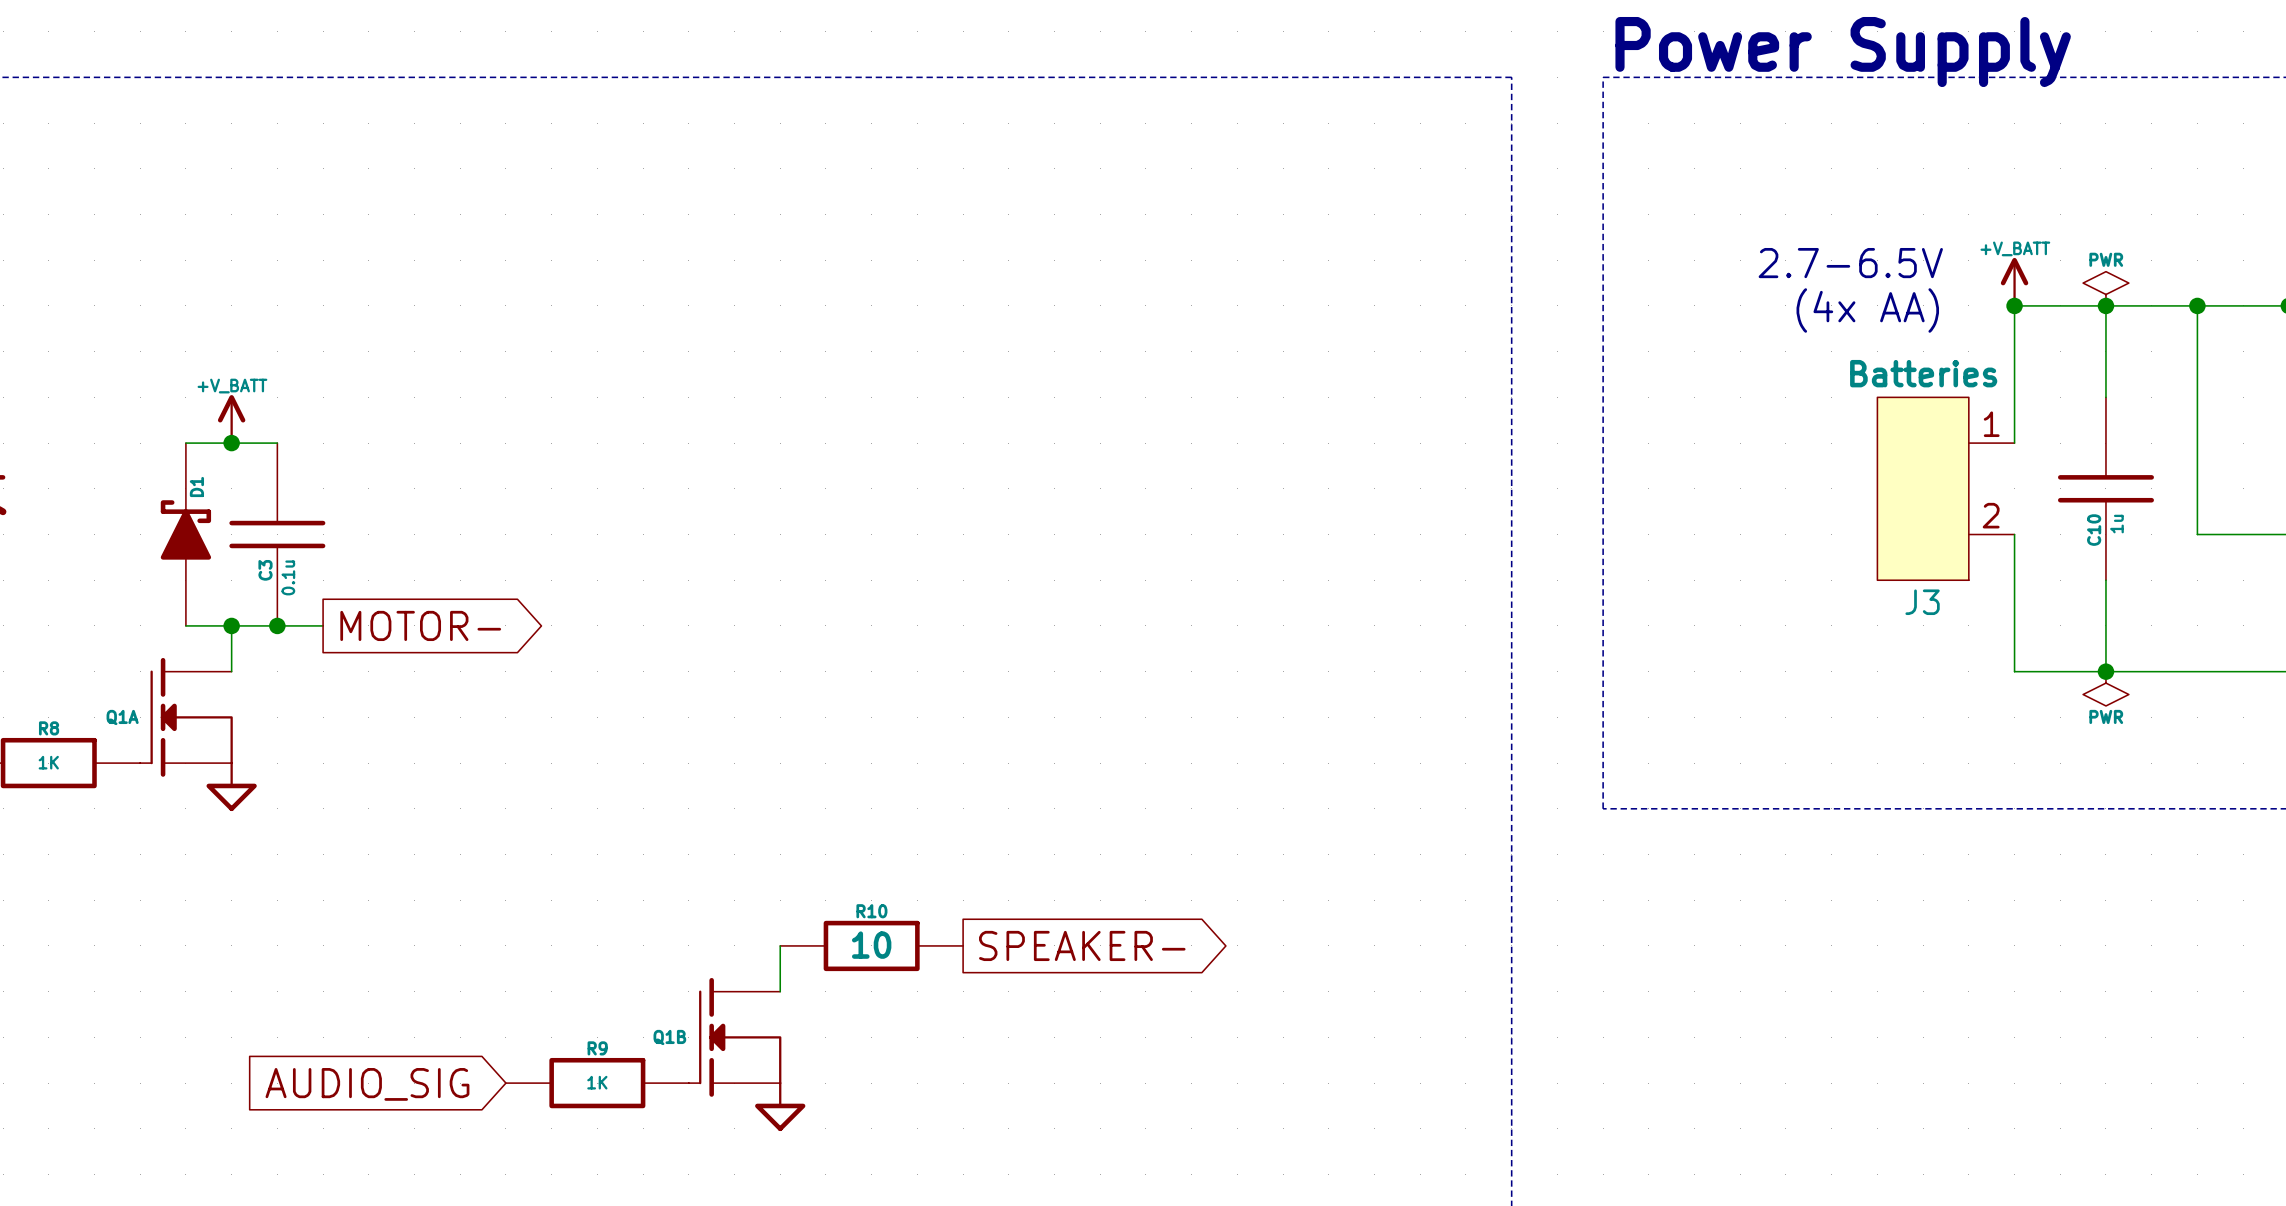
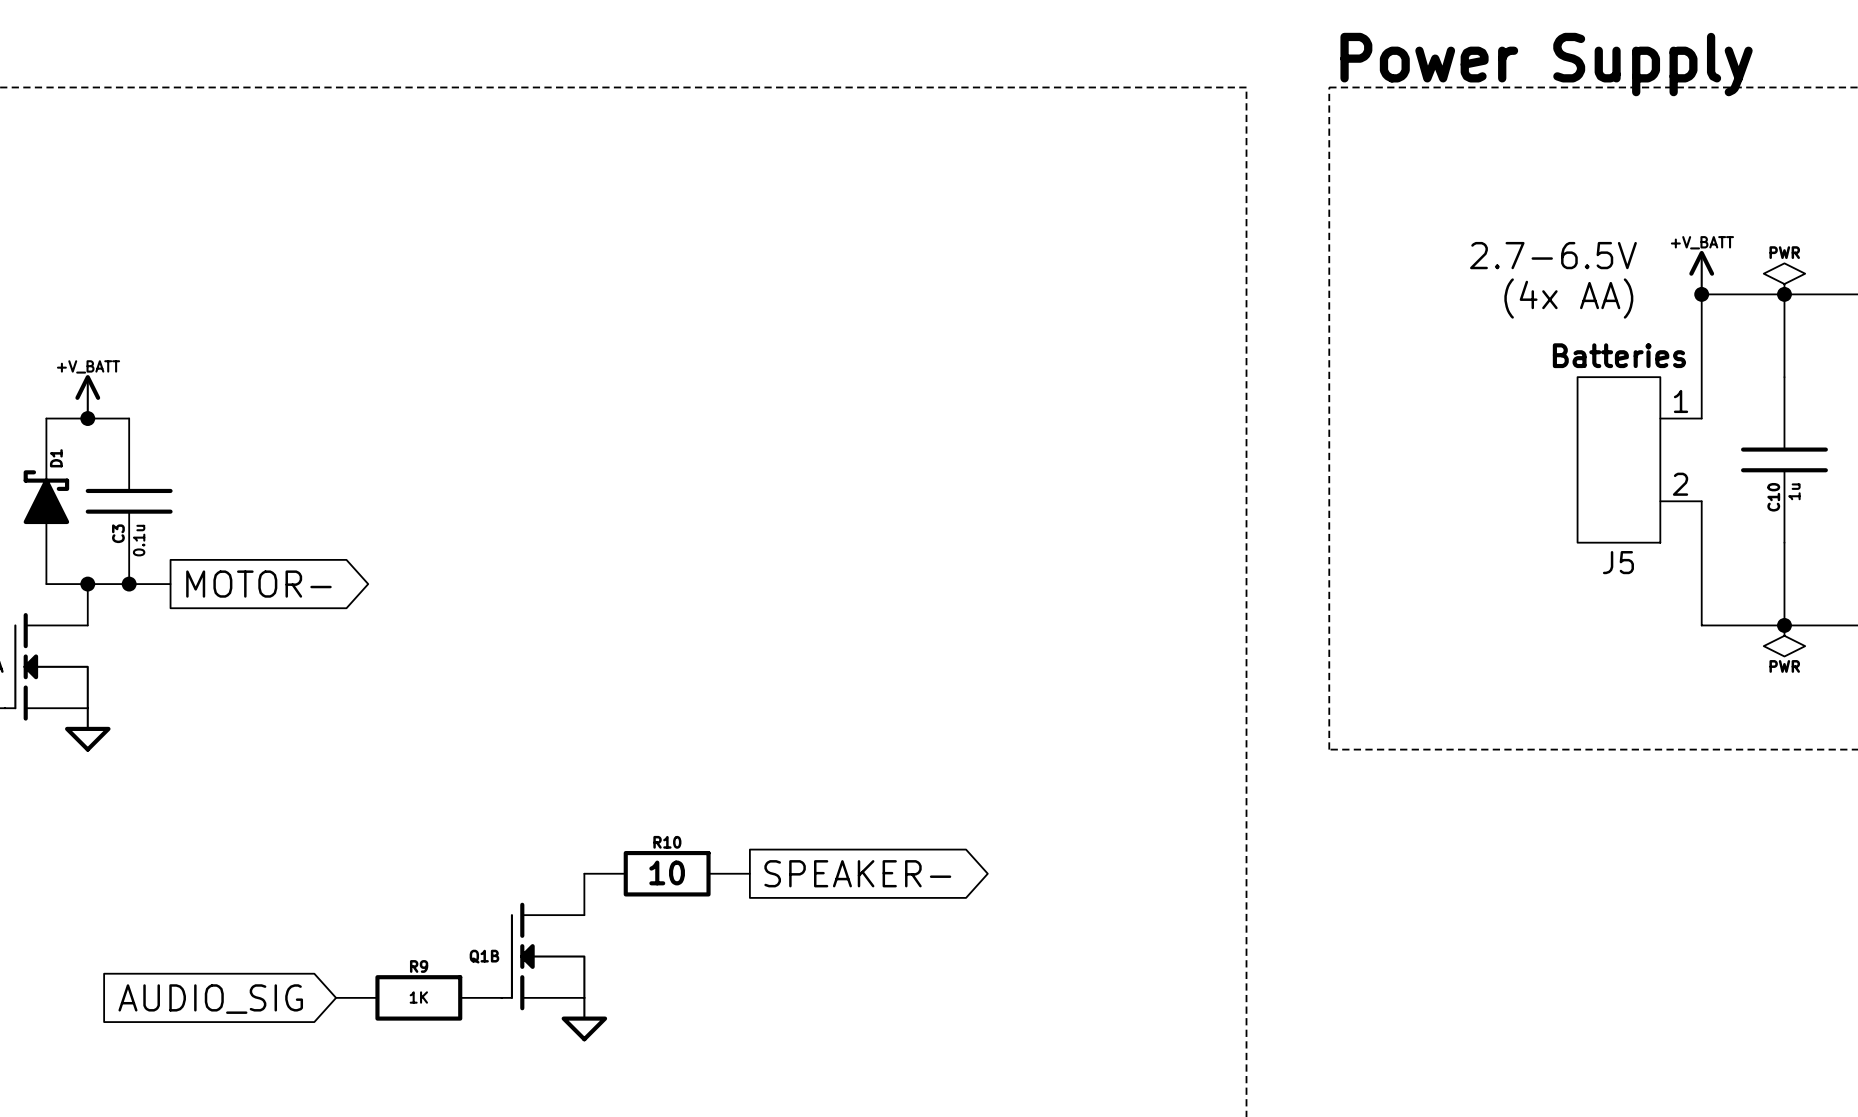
J3 name: J3 (1922, 602) -> J5 (1618, 562)

